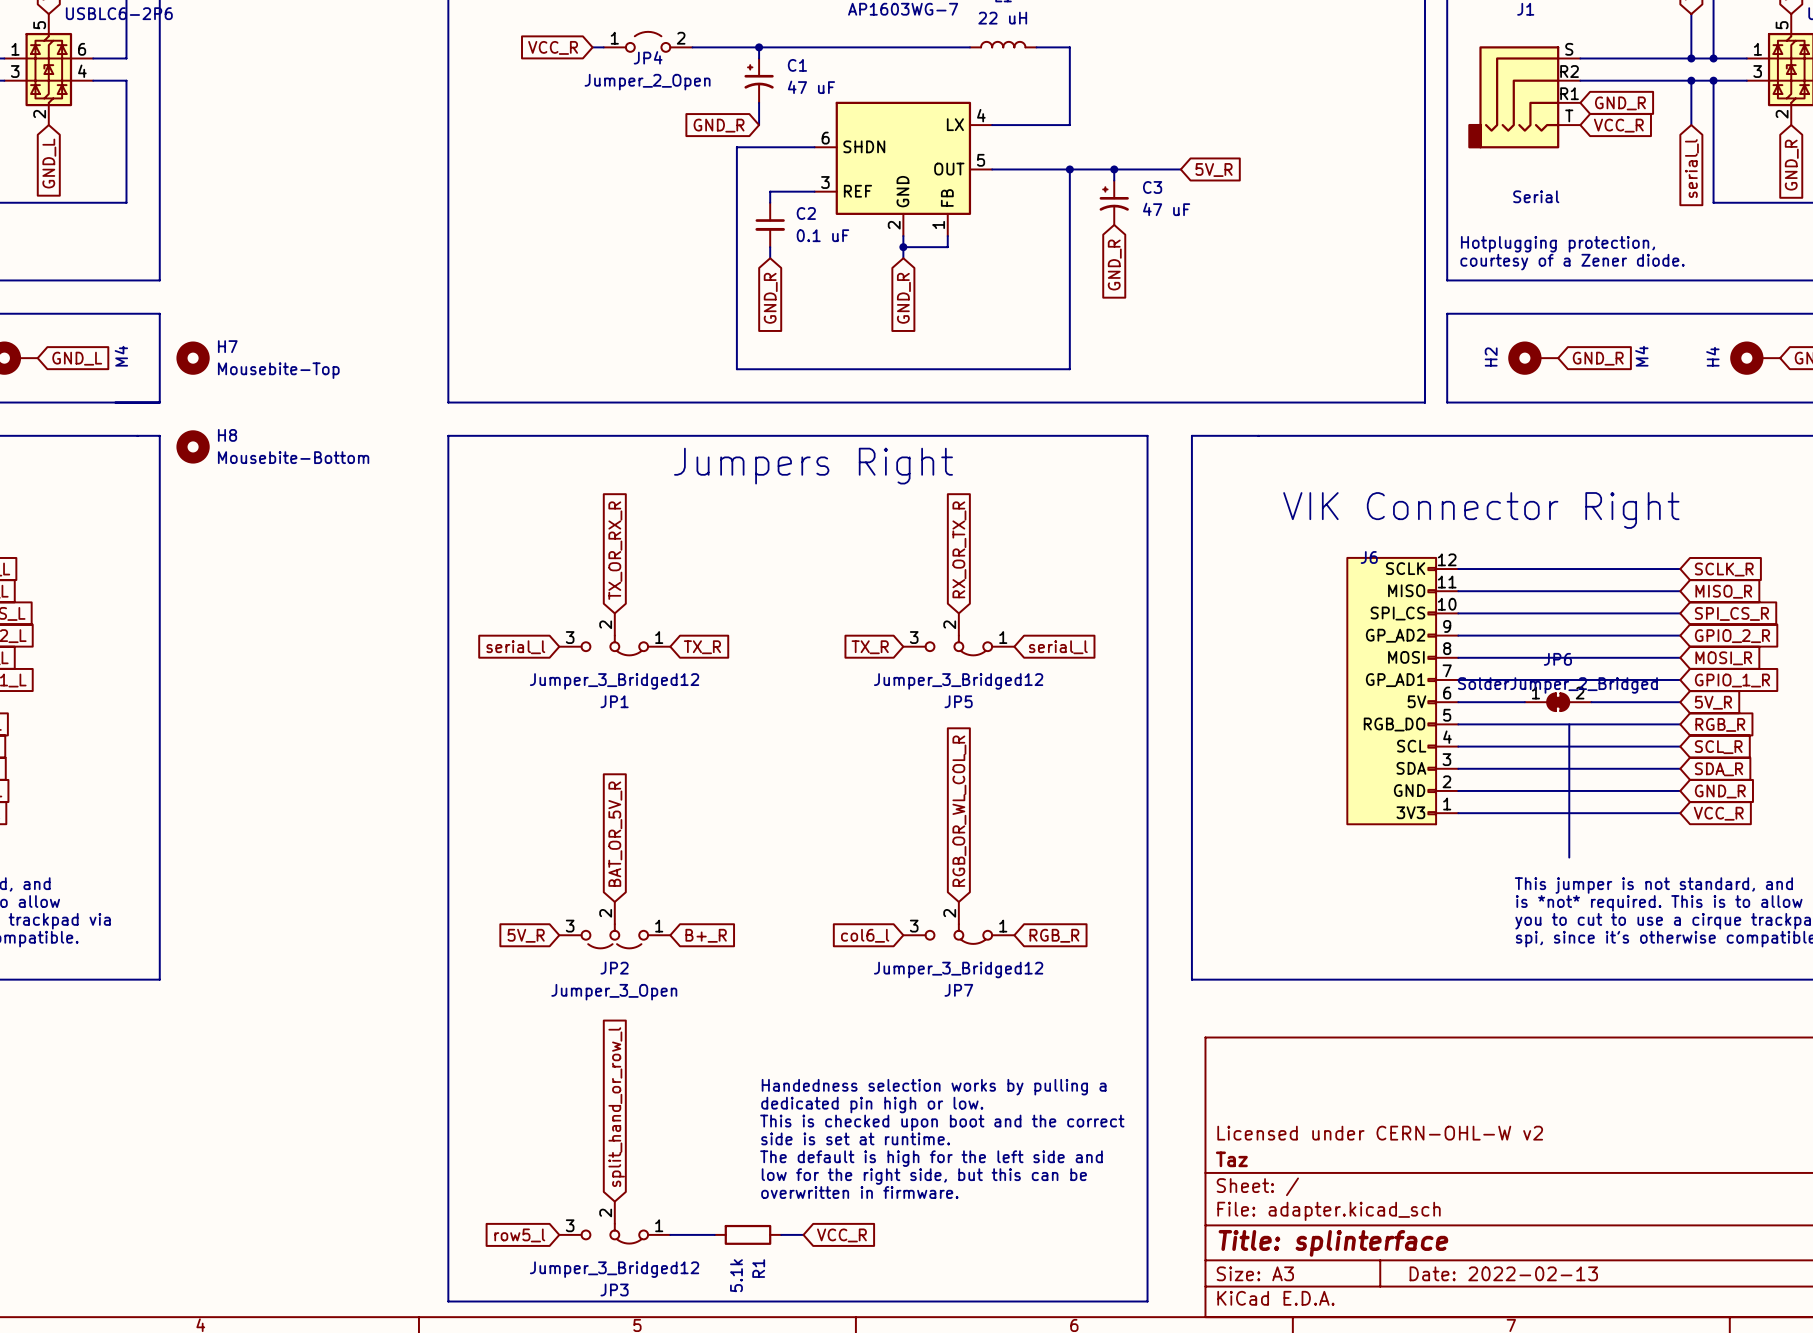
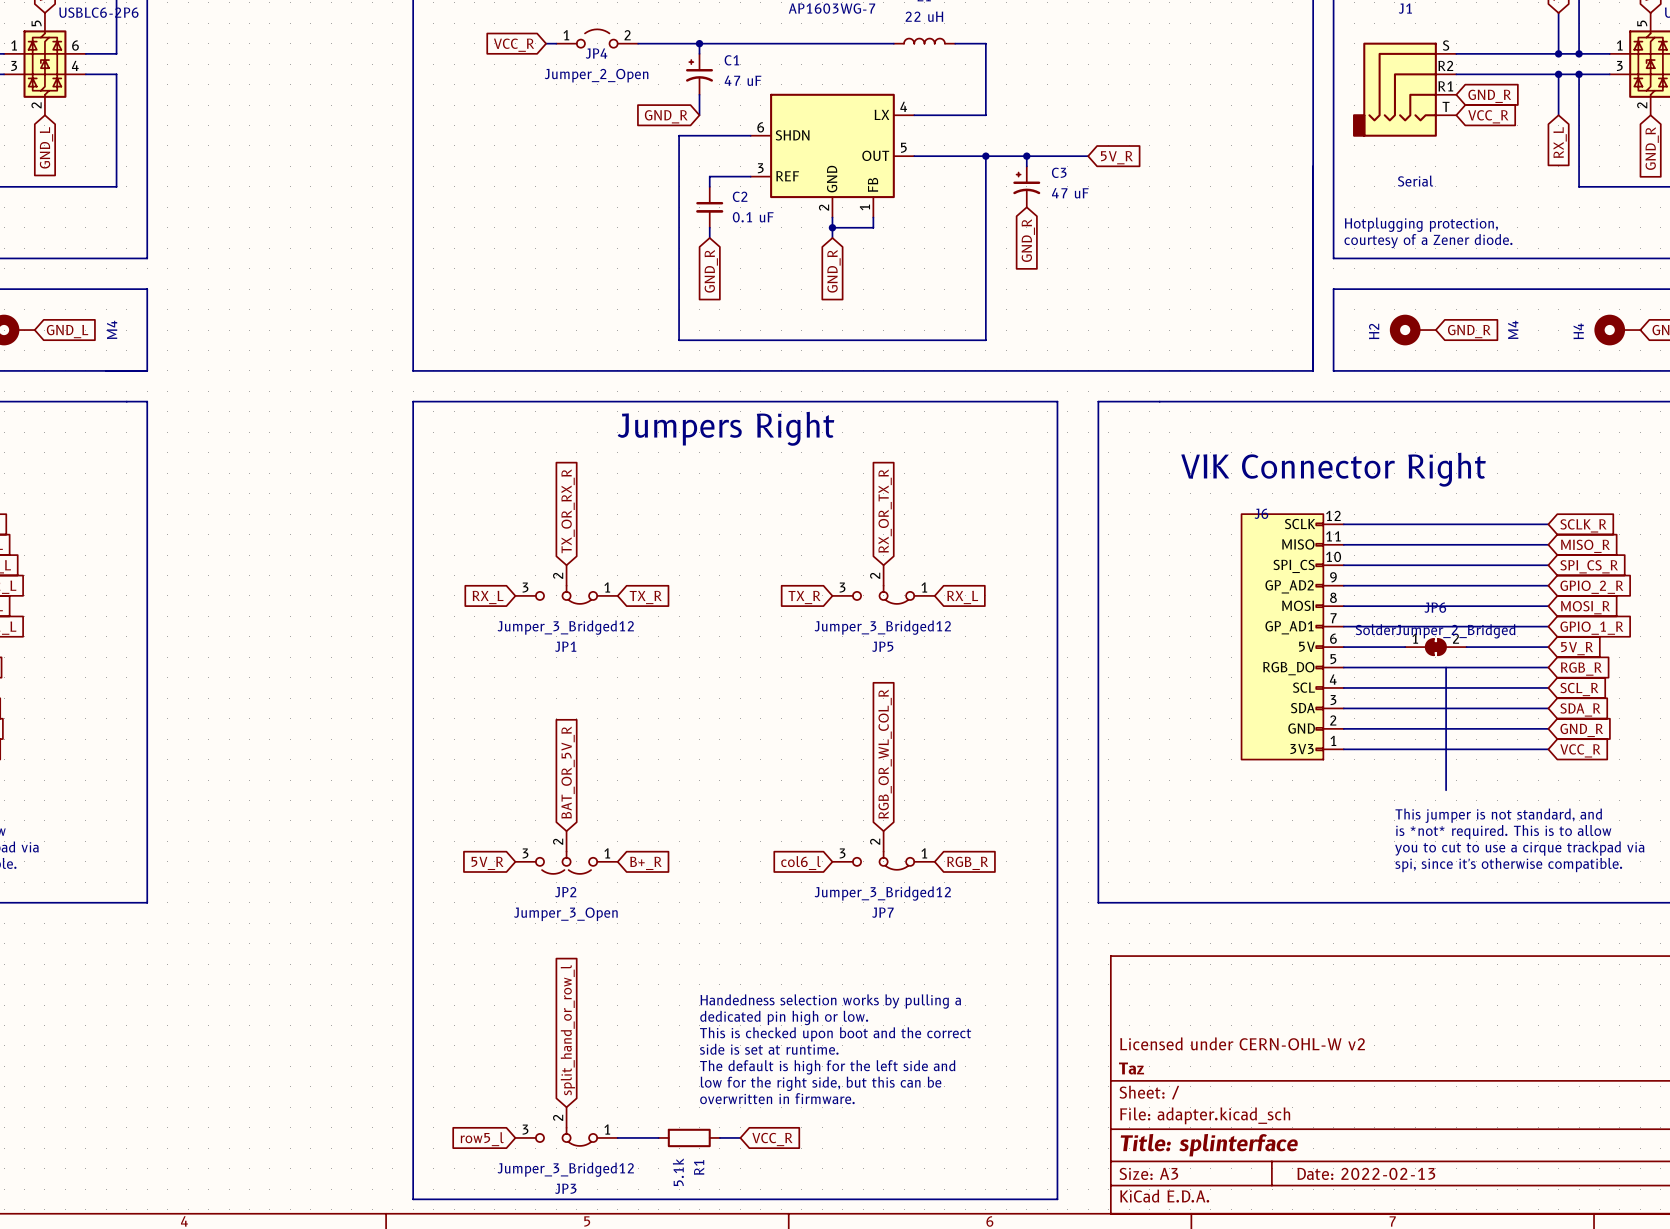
global label: serial_l (1691, 168) -> RX_L (1560, 142)
H7: Mousebite-Top (193, 358) -> none
H8: Mousebite-Bottom (193, 446) -> none
global label: serial_l (515, 647) -> RX_L (488, 597)
global label: serial_l (1058, 647) -> RX_L (962, 597)

